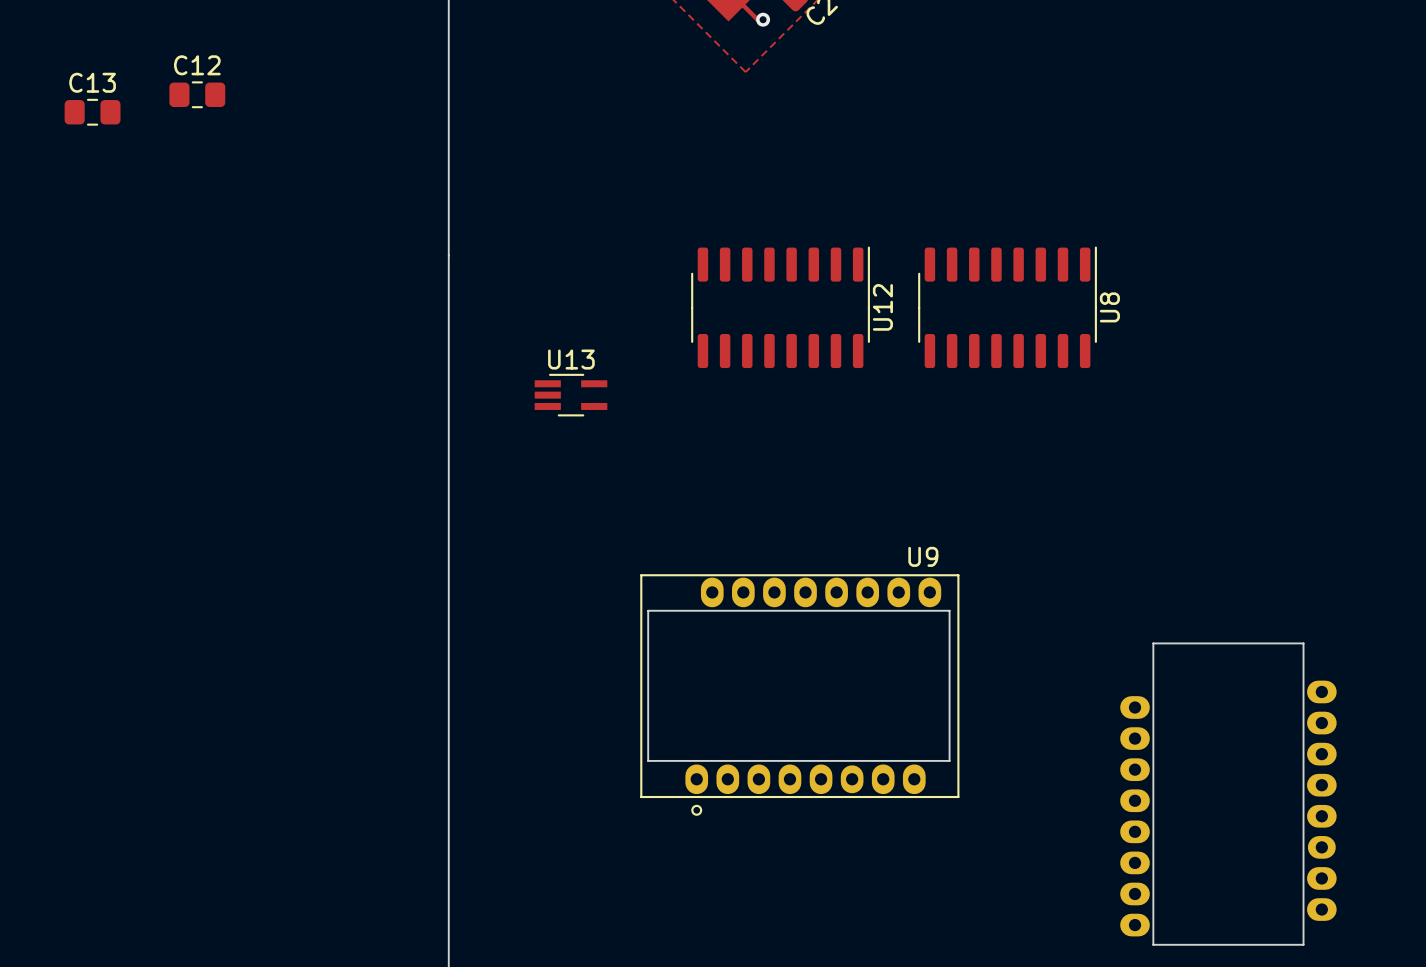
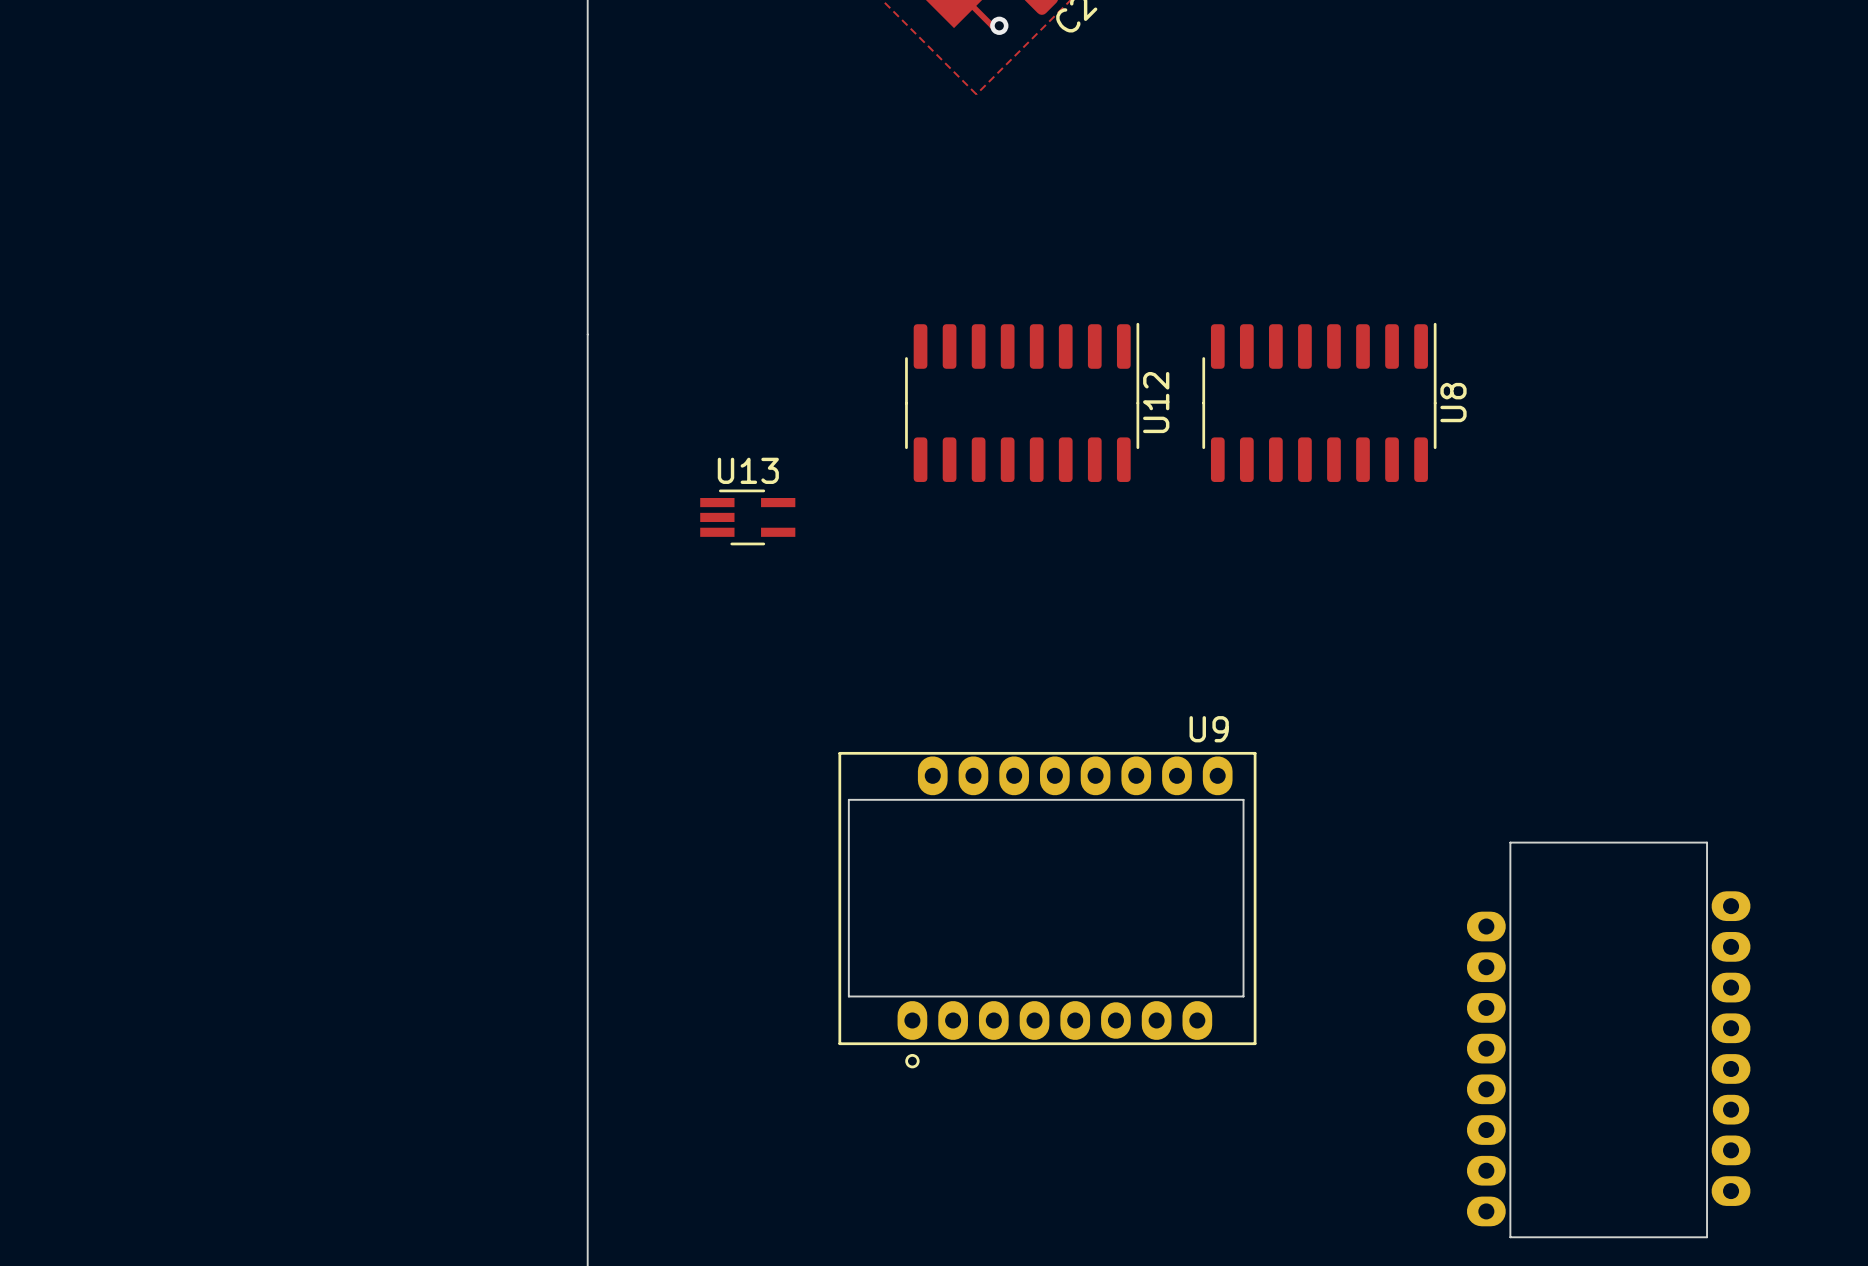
C12: (197, 94) -> none
C13: (92, 112) -> none

